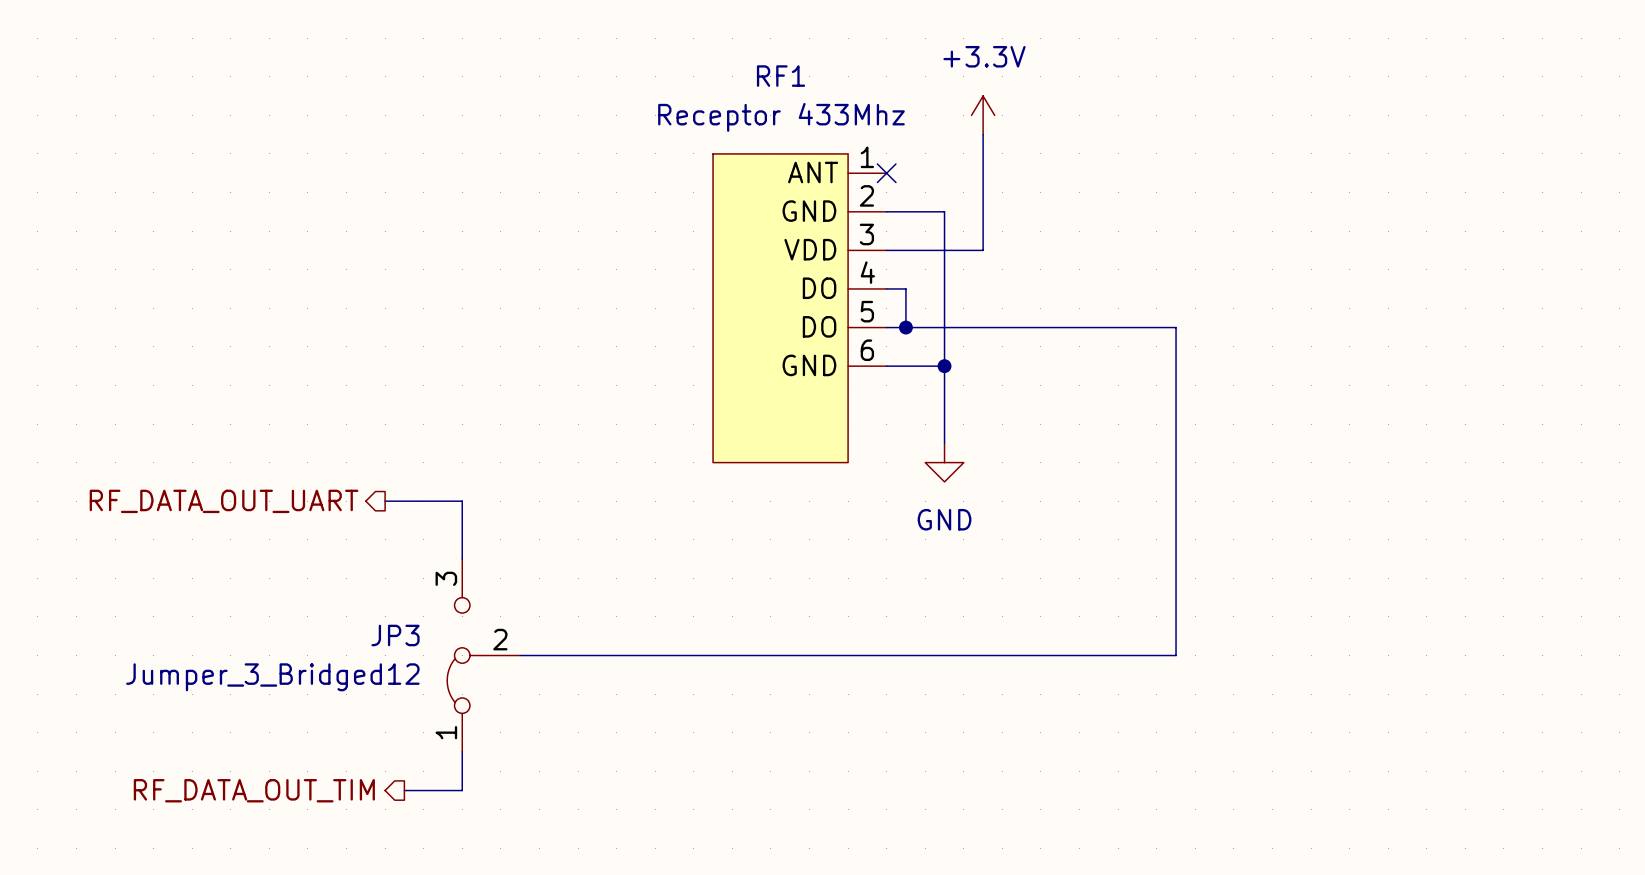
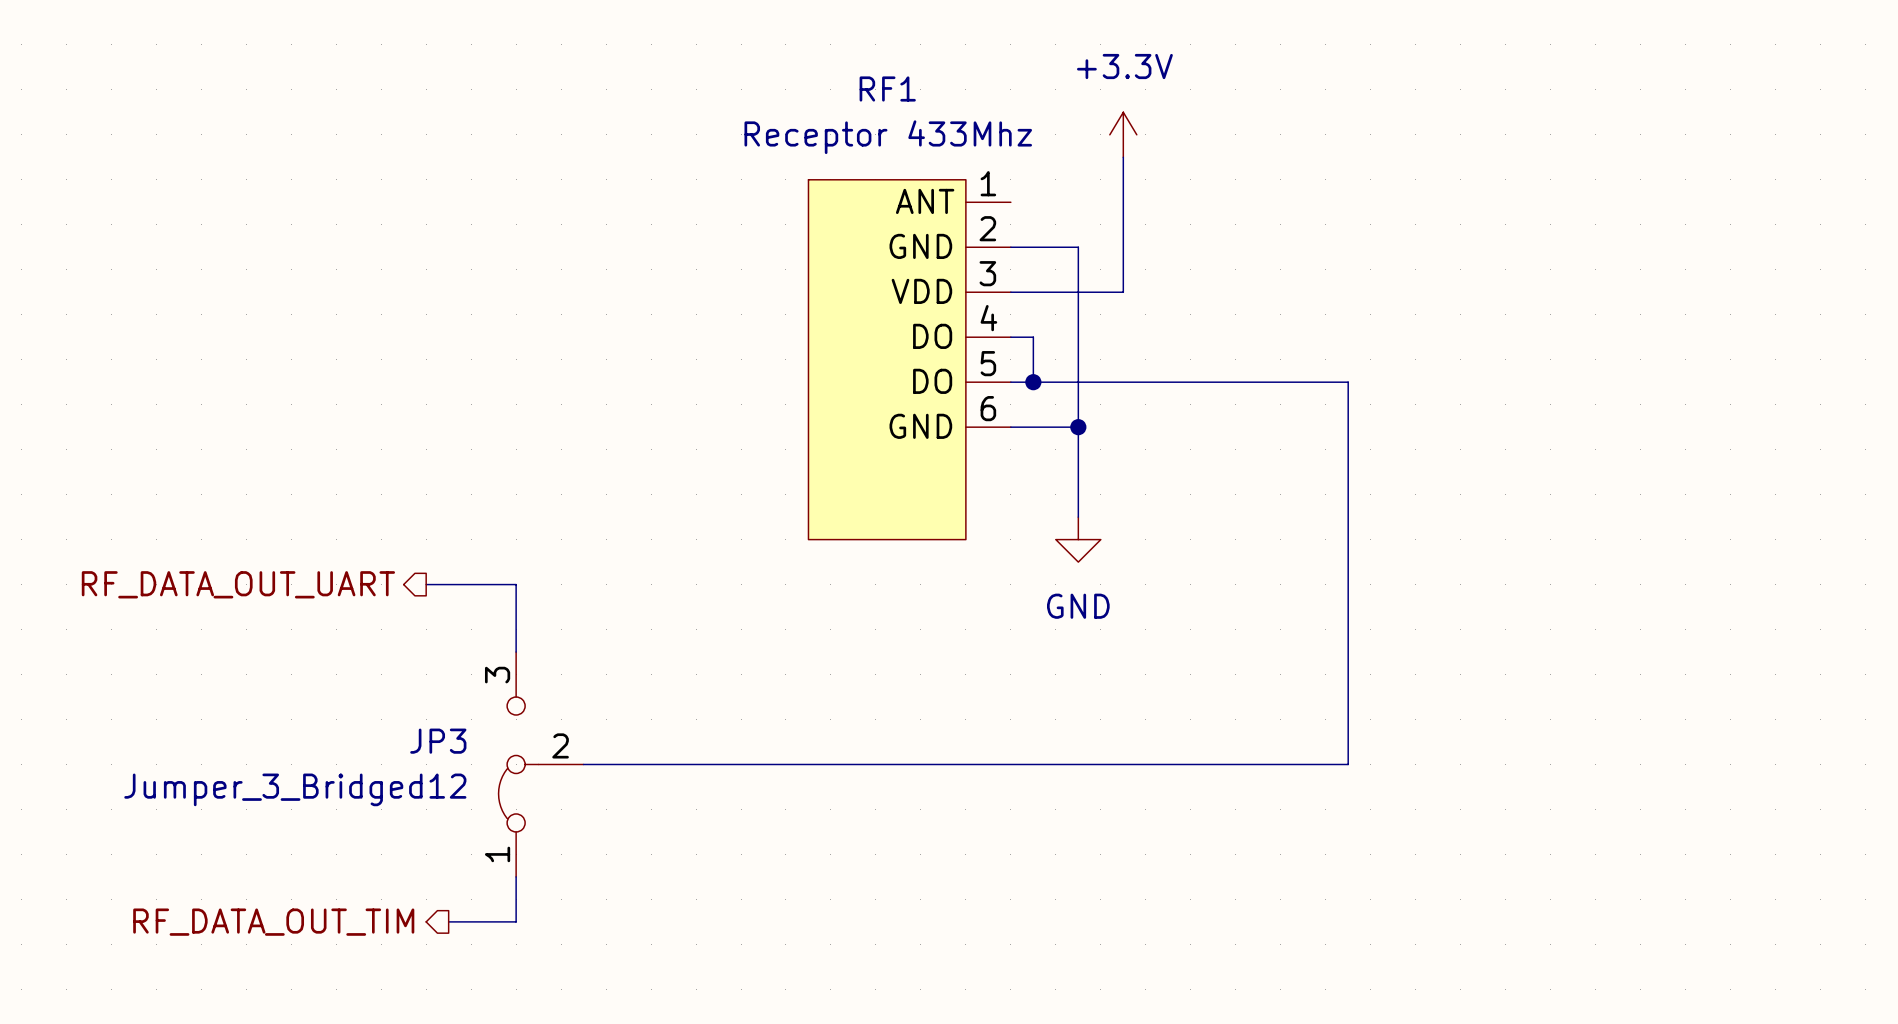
no-connect mark: (886, 173) -> none

